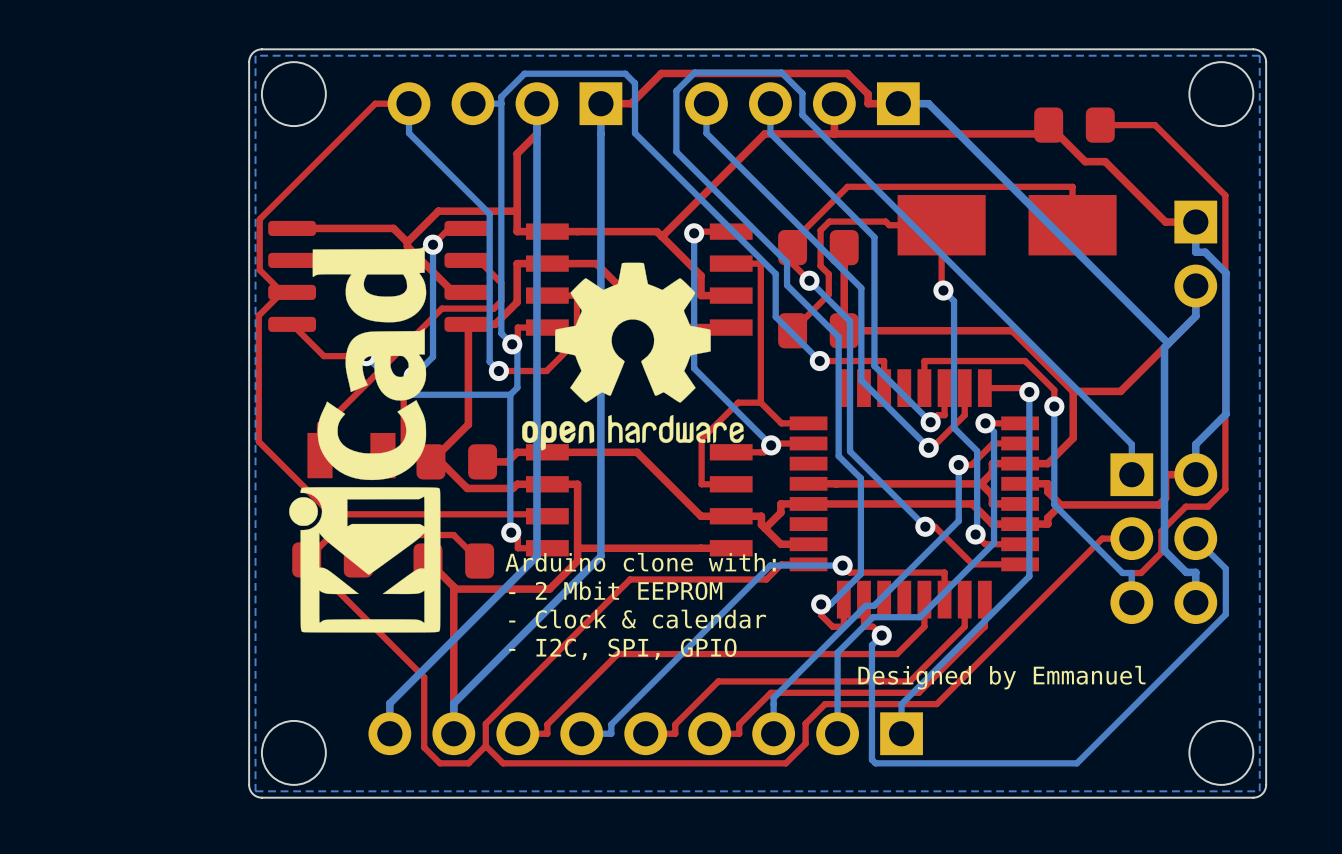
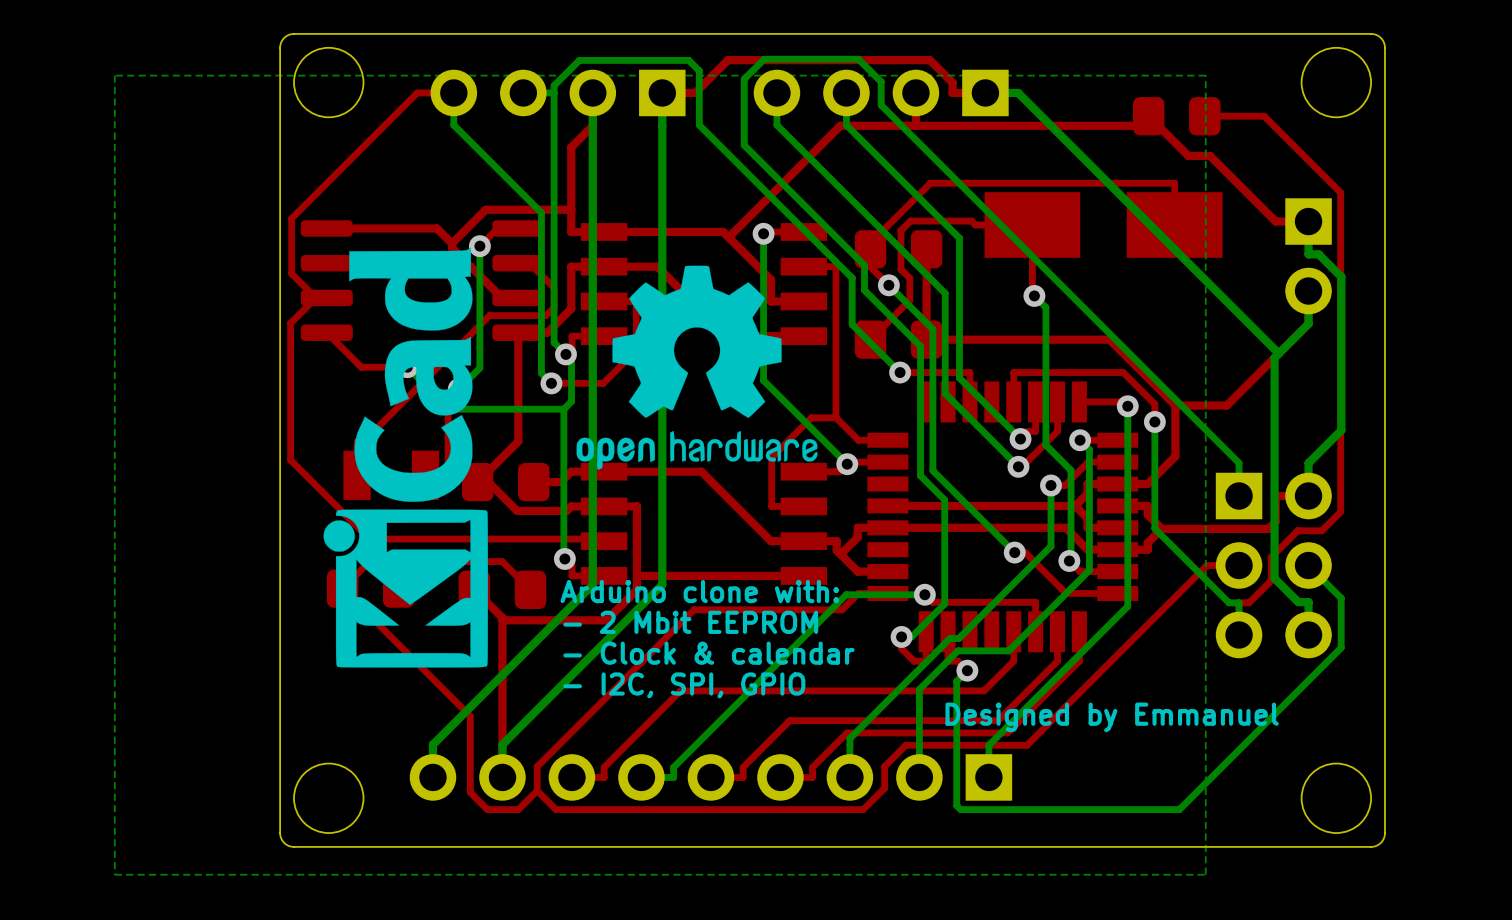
bottom zone outline: (1259, 55) (1259, 791) (255, 791) (255, 55) (1259, 55) -> (1205, 75) (1205, 874) (114, 874) (114, 75) (1205, 75)

